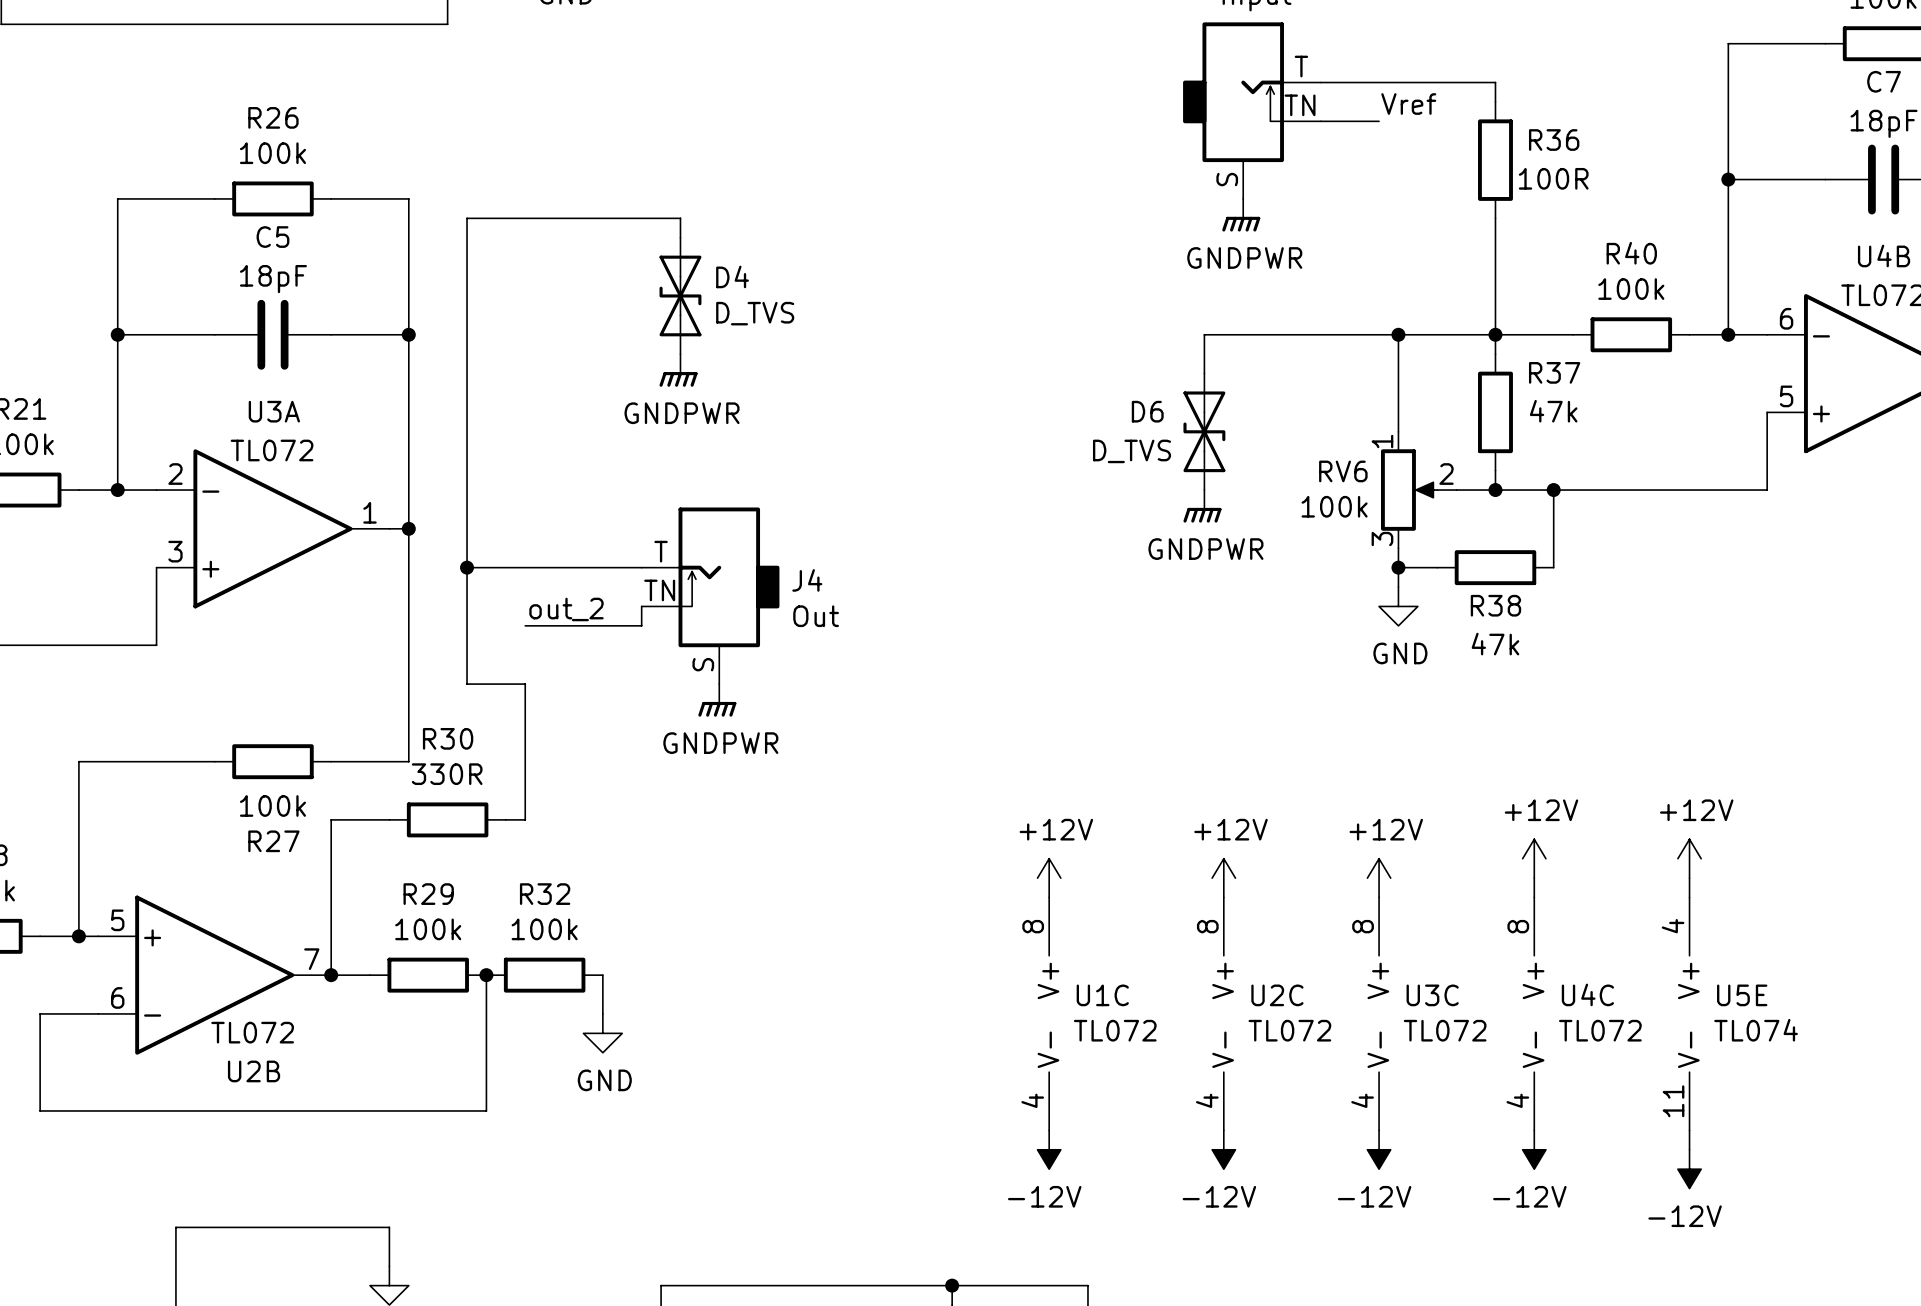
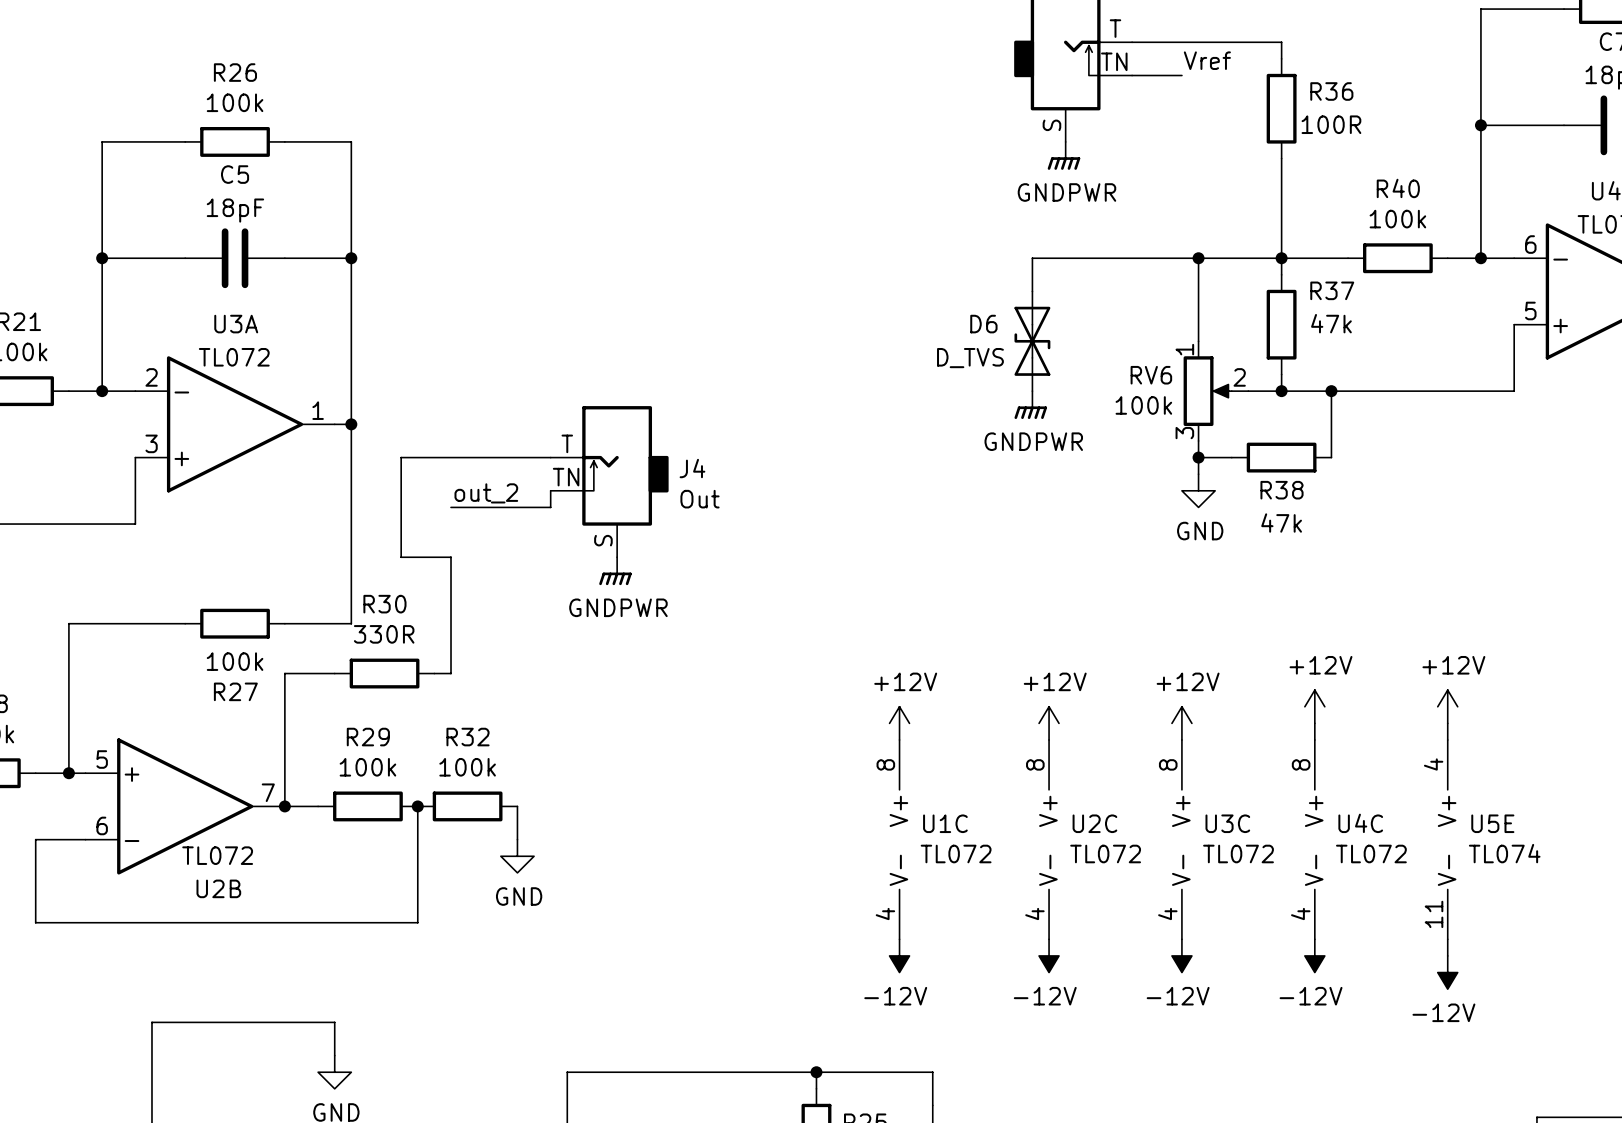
wire: (680, 237) (680, 218) (467, 218) (467, 567) -> none
D4: D_TVS (680, 295) -> none
power symbol: GNDPWR (678, 370) -> none
junction: (467, 567) -> none

